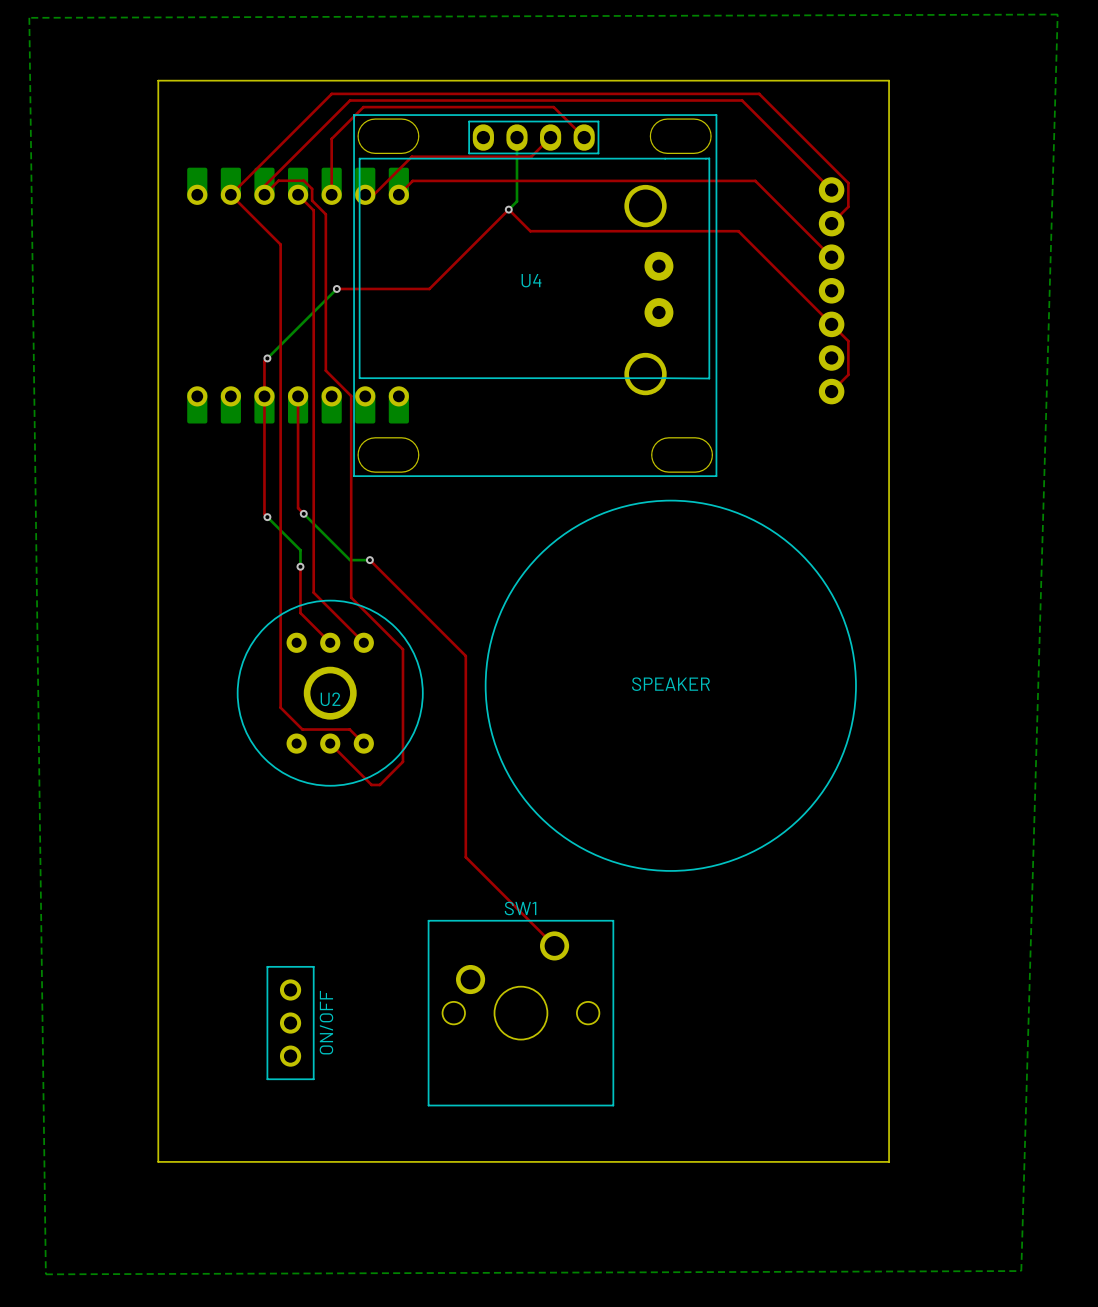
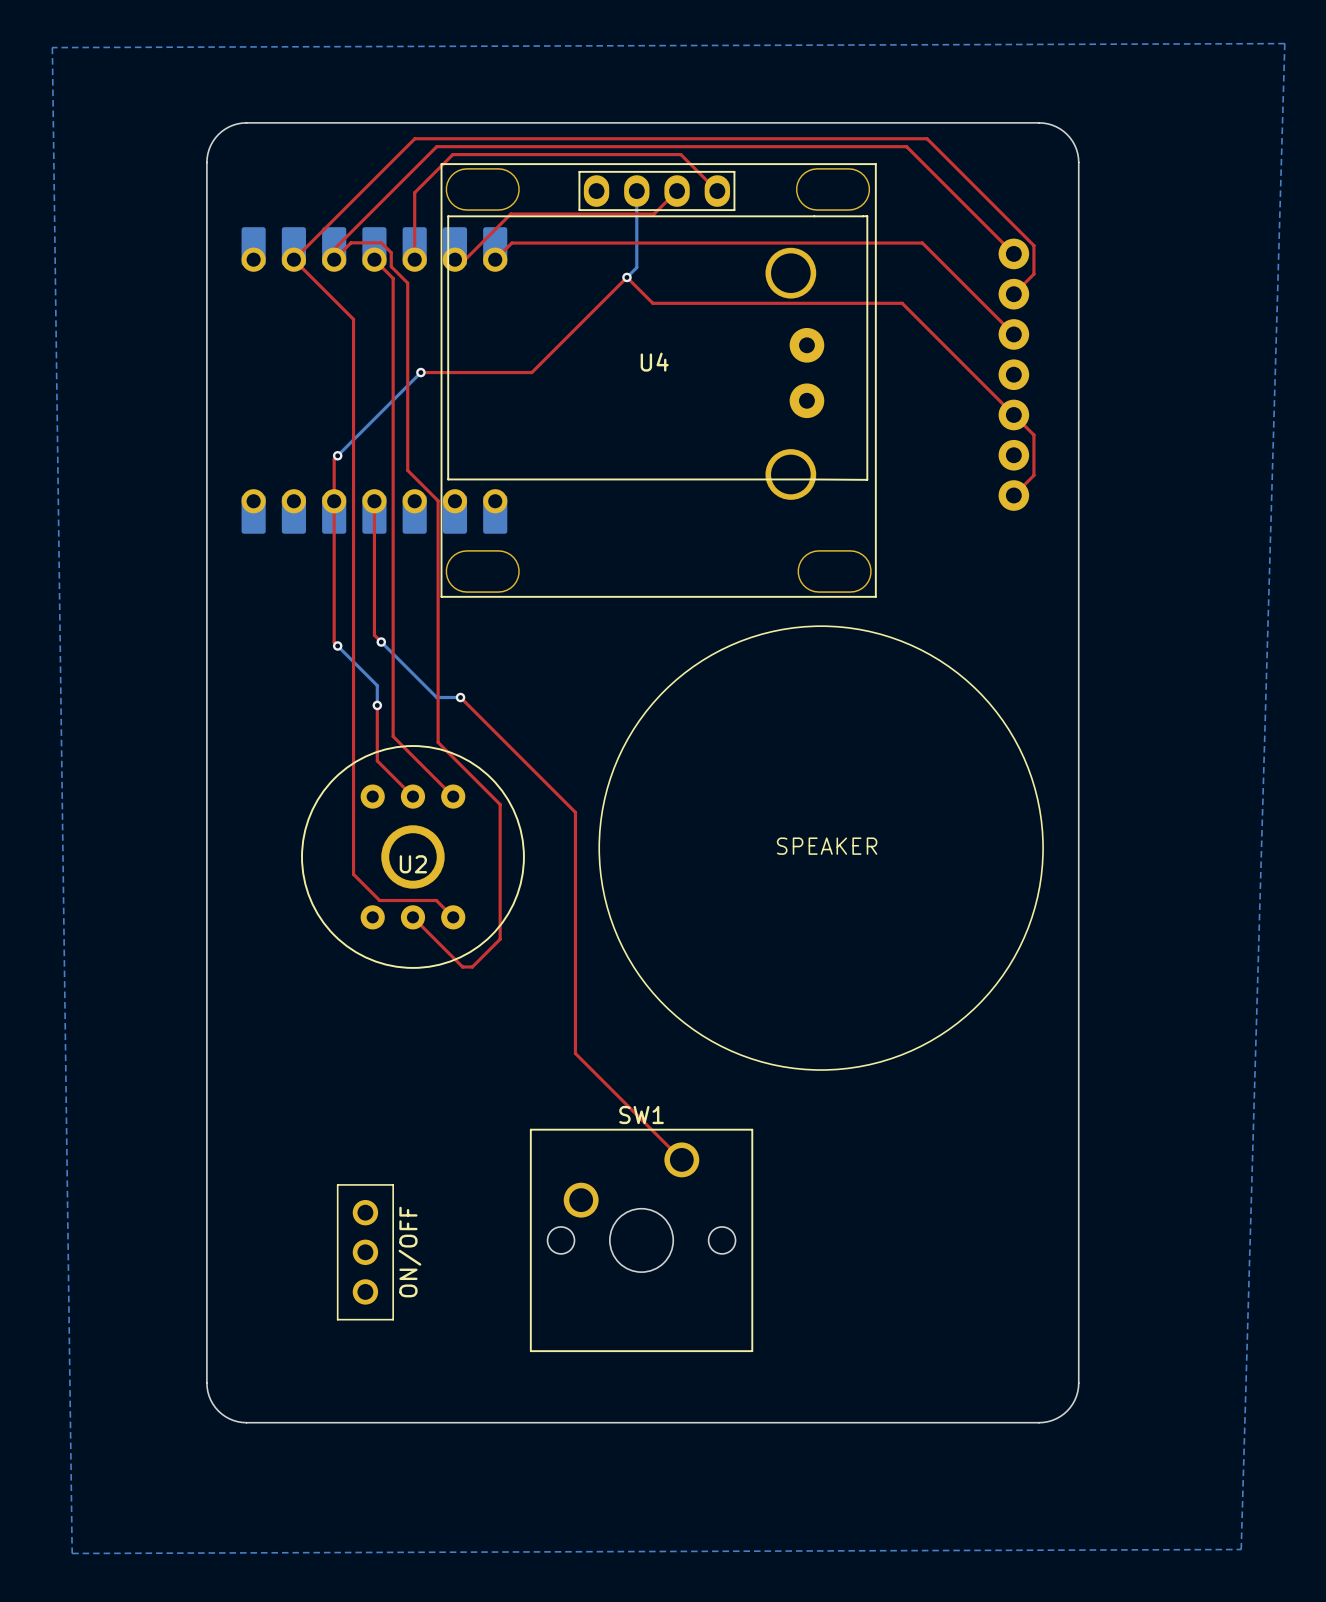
board edge: (191, 80) (158, 80) (158, 113) -> (246, 122) (233, 125) (218, 134) (209, 149) (206, 162)
board edge: (852, 80) (889, 80) (889, 1161) (158, 1161) (158, 1132) -> (1039, 122) (1052, 125) (1067, 134) (1074, 145) (1078, 162) (1078, 1383) (1072, 1404) (1056, 1418) (1039, 1422) (246, 1422) (229, 1418) (218, 1411) (209, 1396) (206, 1383)

